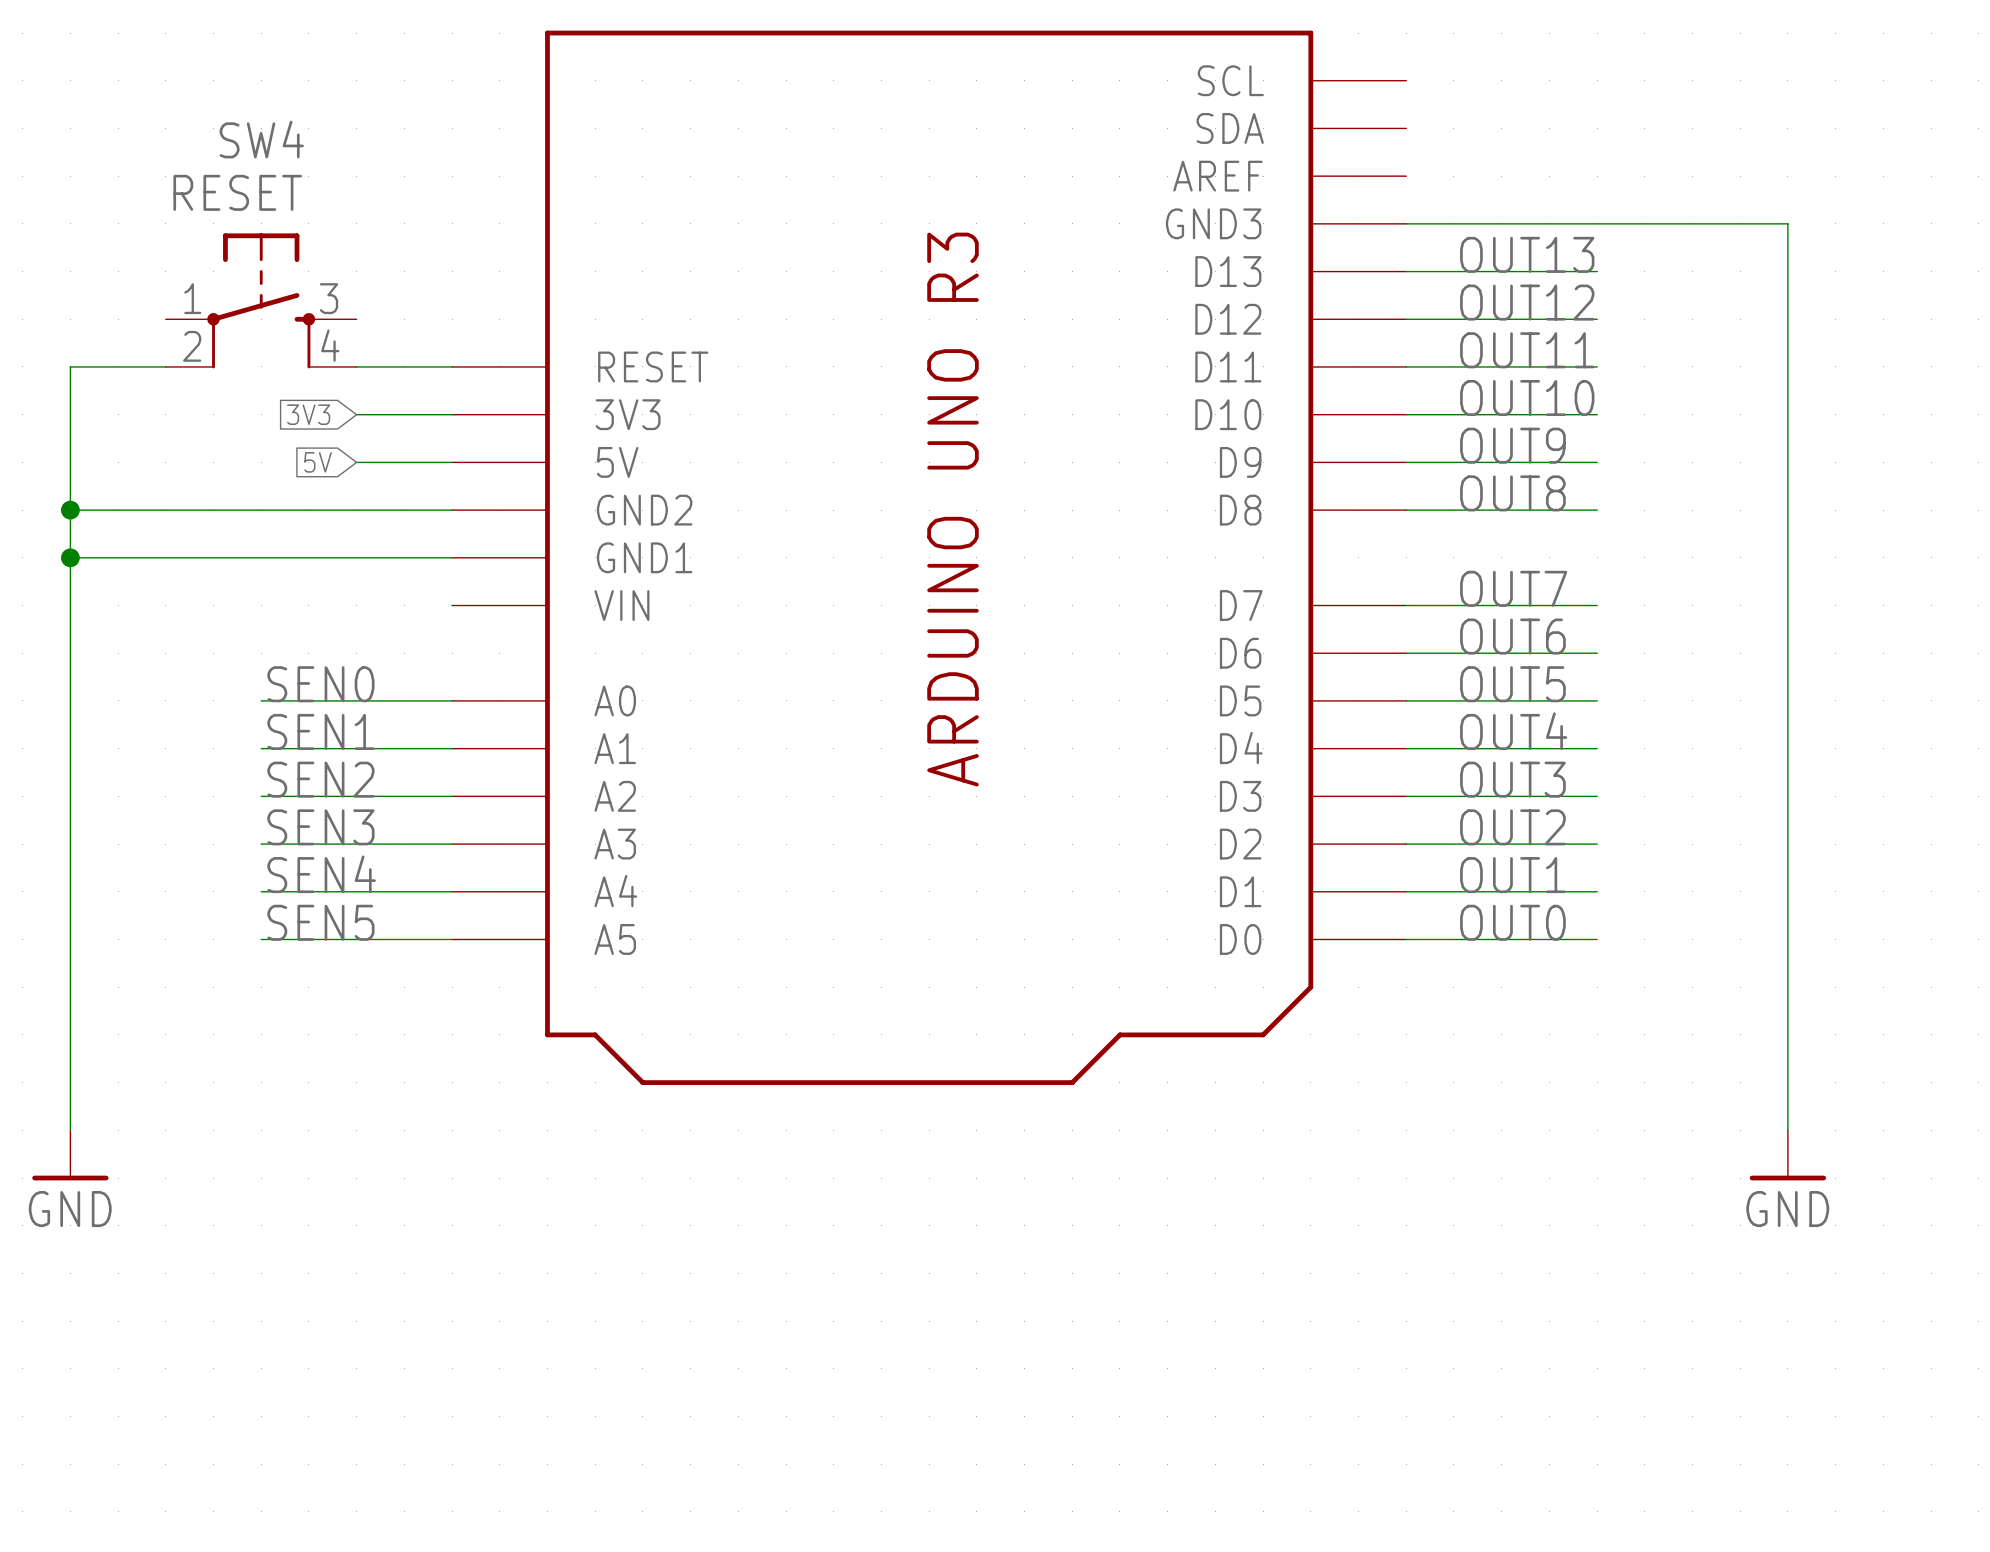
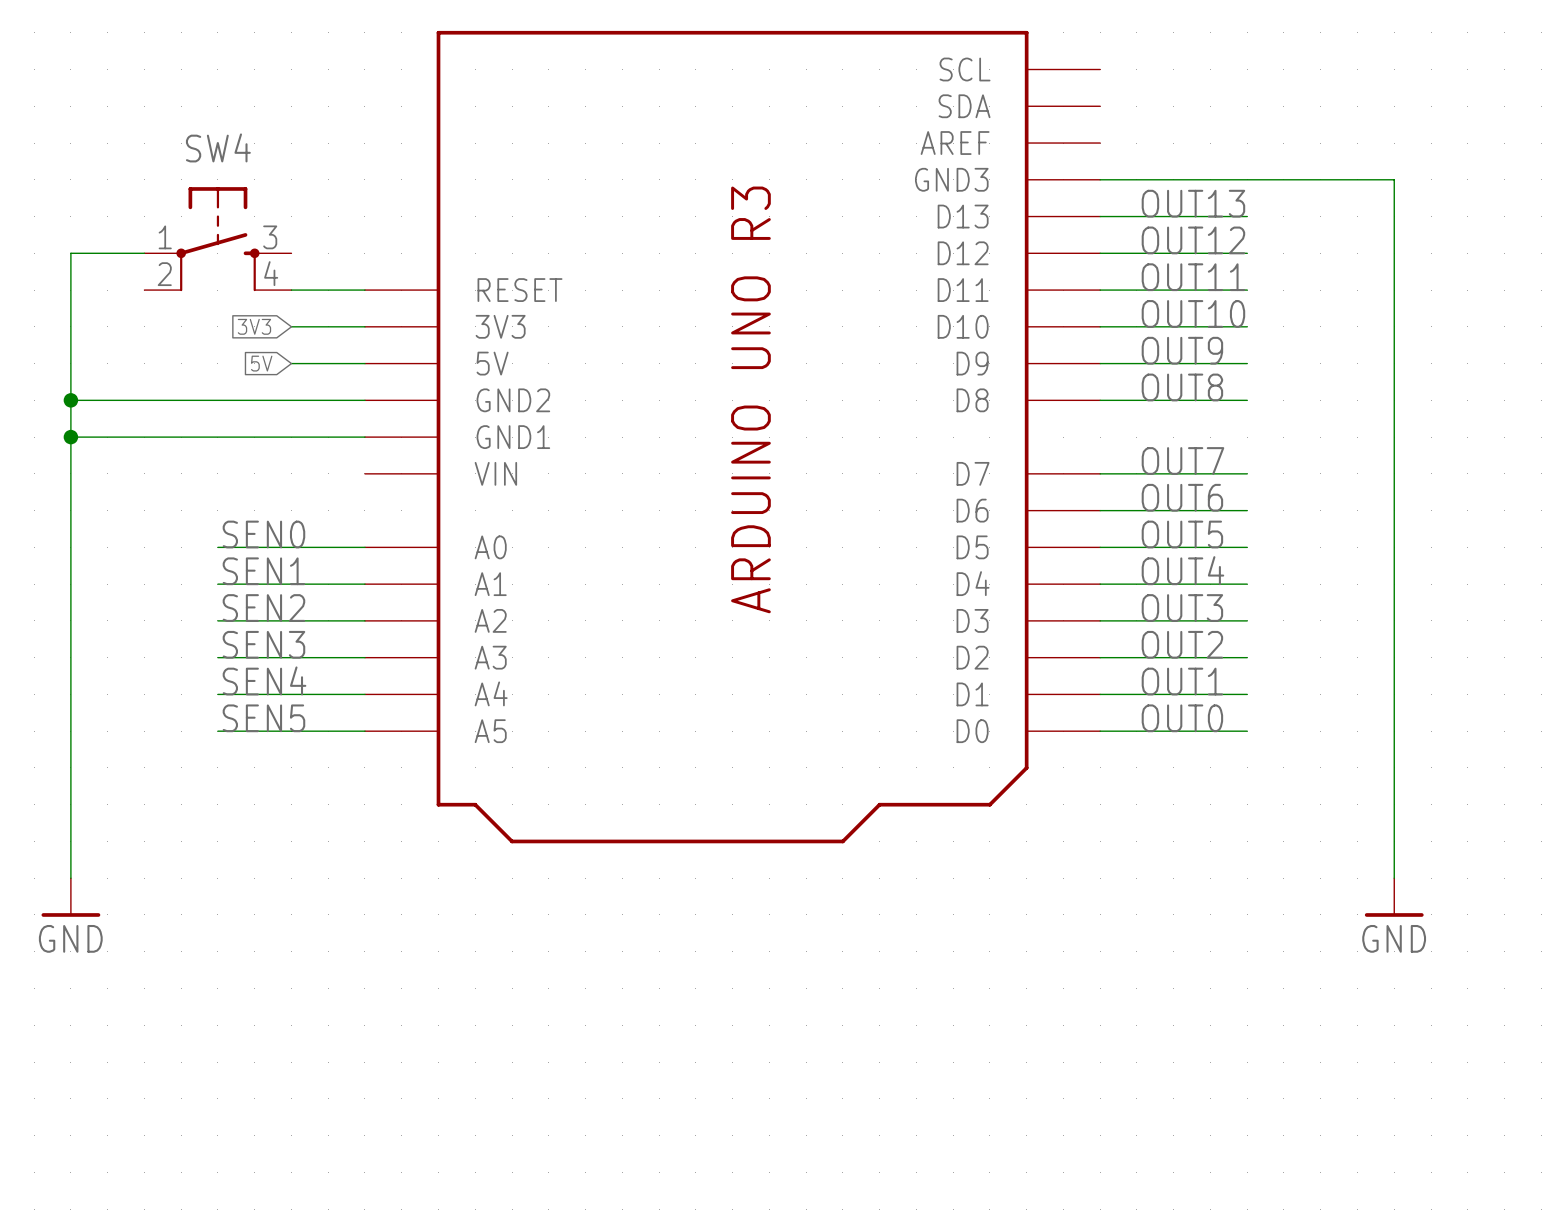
SW4 name position: SW4 (261, 139) -> SW4 (218, 147)
text: RESET (237, 192) -> none
wire: (70, 366) (165, 366) -> (70, 290) (70, 253) (144, 253)

